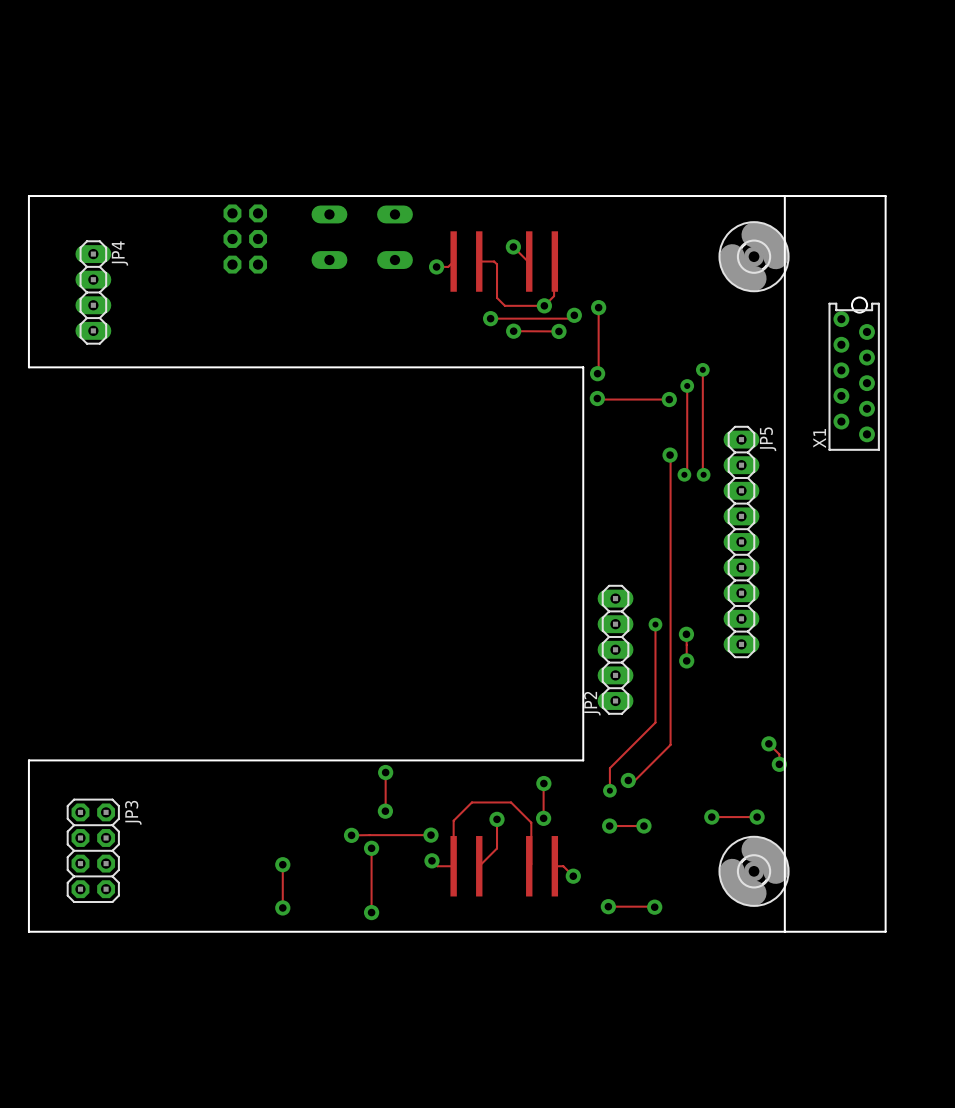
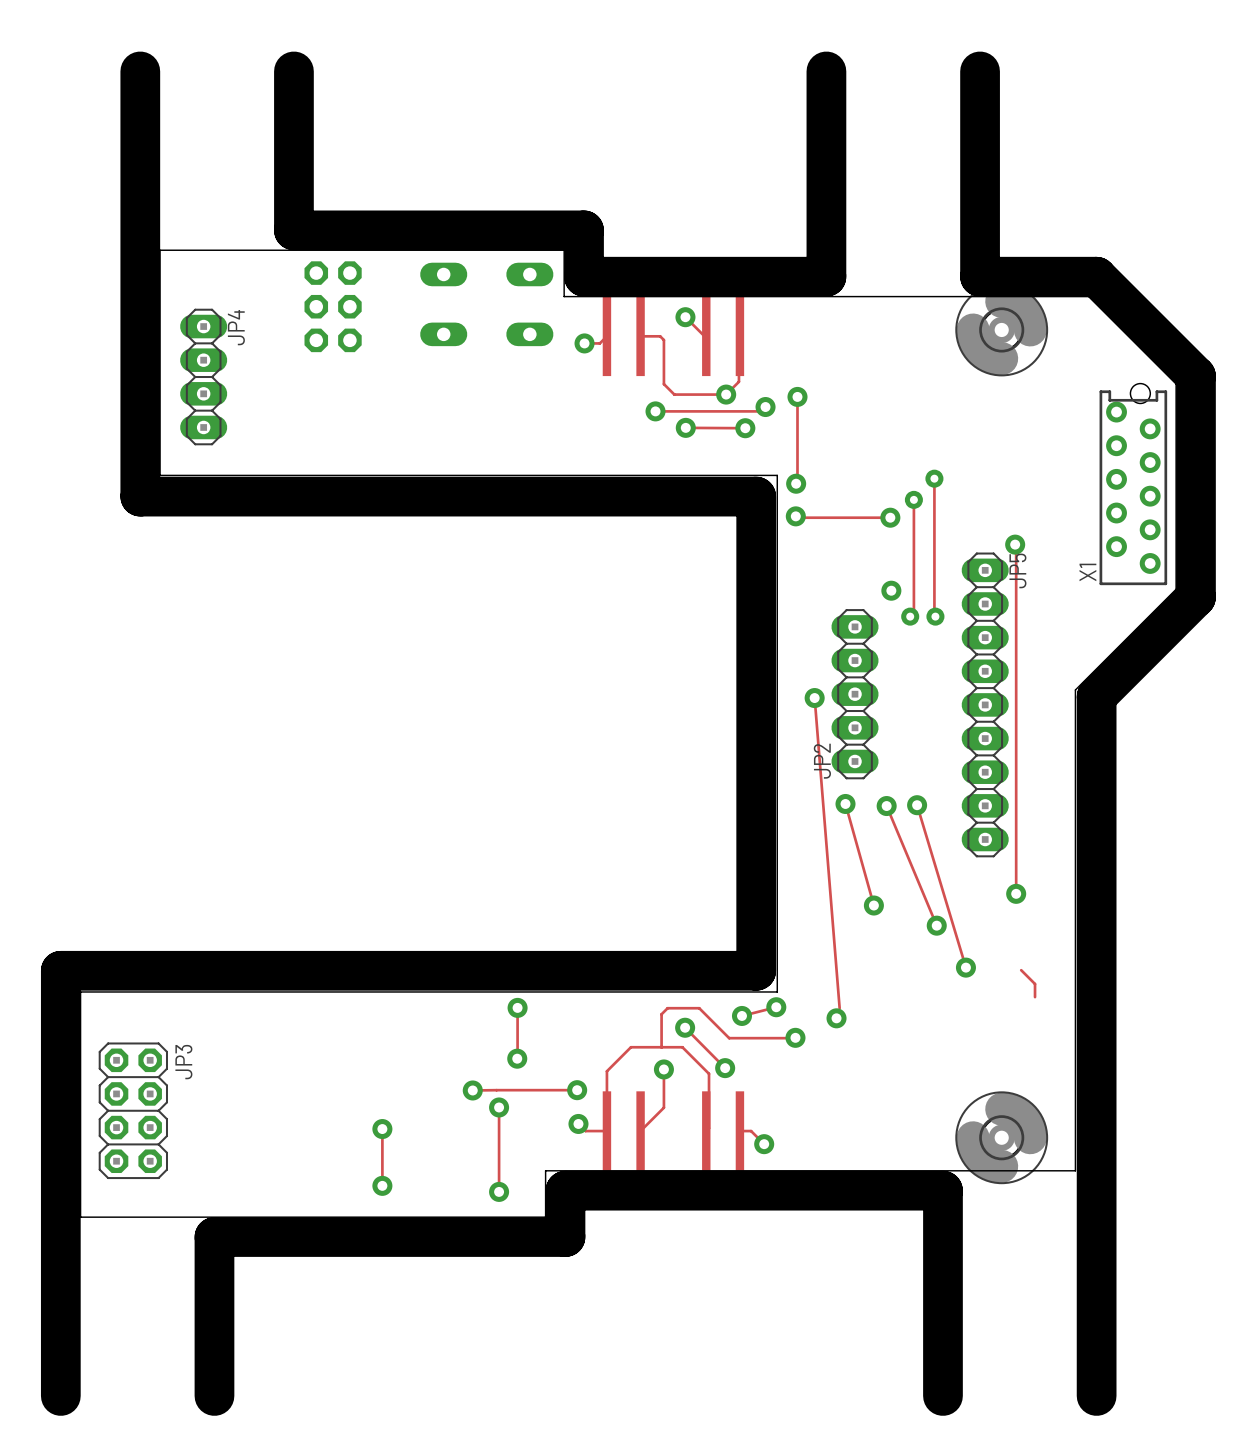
board edge: none -> (140, 71) (140, 496) (756, 496) (756, 970) (60, 970) (60, 1395)
board edge: none -> (293, 71) (293, 230) (584, 230) (584, 276) (826, 276) (826, 71)
board edge: none -> (980, 71) (980, 276) (1096, 276) (1195, 376) (1195, 597) (1096, 696) (1096, 1395)
board edge: (113, 196) (28, 196) (28, 367) (113, 367) -> (160, 250) (160, 475)
board edge: (421, 196) (885, 196) (885, 931) (406, 931) -> (564, 250) (564, 296) (1088, 296) (1176, 384) (1176, 589) (1075, 689) (1075, 1170) (545, 1170) (545, 1217)
board edge: (784, 196) (784, 931) -> none
JP4 position: (93, 292) -> (203, 377)
track: none -> (1015, 544) (1016, 893)
via: none -> (1015, 544)
track: (670, 455) (670, 744) (634, 780) (628, 780) -> none
track: none -> (814, 698) (839, 1008)
via: none -> (814, 698)
track: none -> (845, 803) (873, 905)
via: none -> (845, 803)
track: none -> (886, 806) (936, 925)
via: none -> (886, 806)
track: none -> (917, 805) (965, 967)
via: none -> (917, 805)
track: (655, 624) (655, 722) (609, 768) (609, 790) -> none
via: (655, 624) -> none
track: (686, 634) (686, 660) -> none
via: (686, 634) -> none
JP2 position: (615, 649) -> (855, 694)
via: (686, 660) -> none
via: none -> (1016, 893)
via: none -> (873, 905)
via: none -> (936, 925)
via: none -> (965, 967)
via: (768, 743) -> none
board edge: (53, 760) (28, 760) (28, 931) (53, 931) -> (80, 991) (80, 1217)
via: (779, 764) -> none
track: none -> (776, 1007) (741, 1015)
via: none -> (776, 1007)
track: (543, 783) (543, 818) -> (685, 1027) (725, 1068)
via position: (543, 783) -> (741, 1015)
via: none -> (685, 1027)
via: (609, 790) -> none
track: none -> (795, 1037) (729, 1038) (699, 1008) (667, 1008) (661, 1014) (661, 1047)
via: none -> (795, 1037)
track: (711, 817) (757, 817) -> none
via: (711, 817) -> none
via: (757, 817) -> none
track: (609, 826) (643, 826) -> none
via: (609, 826) -> none
via: (643, 826) -> none
track: (608, 906) (654, 907) -> none
via: (608, 906) -> none
via: (654, 907) -> none
board edge: none -> (214, 1395) (214, 1237) (565, 1237) (565, 1190) (942, 1190) (942, 1395)

